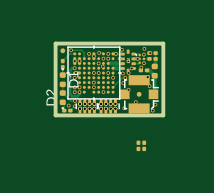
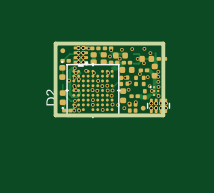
via: none -> (88, 48)
part: none -> (95, 48)
part: none -> (108, 48)
via: none -> (132, 49)
track: (71, 50) (81, 50) (84, 52) (84, 58) -> none
via: (71, 50) -> none
via: none -> (111, 50)
via: (99, 52) -> none
via: (89, 53) -> none
via: (108, 53) -> none
via: (115, 53) -> none
part: (152, 53) -> none
via: (143, 54) -> none
part: none -> (80, 55)
part: none -> (80, 55)
part: none -> (120, 55)
via: (93, 56) -> none
via: none -> (109, 56)
part: none -> (95, 58)
via: (103, 58) -> none
via: (108, 58) -> none
part position: (139, 58) -> (154, 90)
part: none -> (146, 58)
part: (152, 58) -> none
part: none -> (161, 58)
via: (74, 61) -> none
via: (79, 61) -> none
part: (128, 61) -> none
via: (128, 61) -> none
part: none -> (114, 62)
part: none -> (126, 62)
via: (98, 63) -> none
part rotation: 0° (62, 64) -> 90° clockwise (65, 60)
via: (102, 66) -> none
via: (141, 67) -> none
via: (131, 68) -> none
part: none -> (127, 69)
part: none -> (62, 70)
via: none -> (86, 70)
via: none -> (158, 71)
part position: (93, 73) -> (92, 90)
via: (98, 73) -> none
via: (122, 73) -> none
via: (128, 73) -> none
via: none -> (139, 73)
via: none -> (158, 76)
D1: (62, 77) -> none
via: (113, 77) -> none
via: none -> (78, 79)
via: none -> (68, 80)
via: none -> (98, 80)
part: none -> (121, 80)
part: none -> (127, 80)
part: none -> (136, 80)
part: none -> (143, 80)
via: none -> (158, 81)
via: (93, 82) -> none
via: none -> (129, 82)
via: (123, 83) -> none
via: none -> (74, 85)
via: none -> (107, 85)
via: none -> (102, 86)
via: none -> (158, 86)
via: (79, 87) -> none
via: (93, 87) -> none
via: none -> (75, 90)
via: none -> (92, 90)
via: none -> (97, 90)
via: none -> (107, 90)
via: none -> (112, 90)
via: none -> (151, 90)
via: (74, 92) -> none
via: (79, 92) -> none
via: (103, 92) -> none
part position: (139, 94) -> (143, 108)
part: (139, 94) -> none
part: none -> (144, 94)
track: none -> (154, 94) (147, 97) (137, 96)
via: none -> (111, 95)
part: none -> (123, 95)
part: none -> (134, 96)
via: none -> (158, 96)
via: none -> (92, 100)
via: none -> (129, 103)
via: none -> (92, 104)
via: none -> (112, 104)
via: (155, 104) -> none
via: (68, 105) -> none
via: none -> (118, 105)
part: none -> (158, 105)
part: none -> (158, 105)
part: (87, 106) -> none
part: (87, 106) -> none
part: (108, 106) -> none
part: (108, 106) -> none
part: none -> (129, 107)
part: none -> (135, 107)
via: none -> (102, 109)
via: none -> (74, 110)
via: none -> (79, 110)
via: (152, 110) -> none
part: (138, 145) -> none
part: (144, 145) -> none

